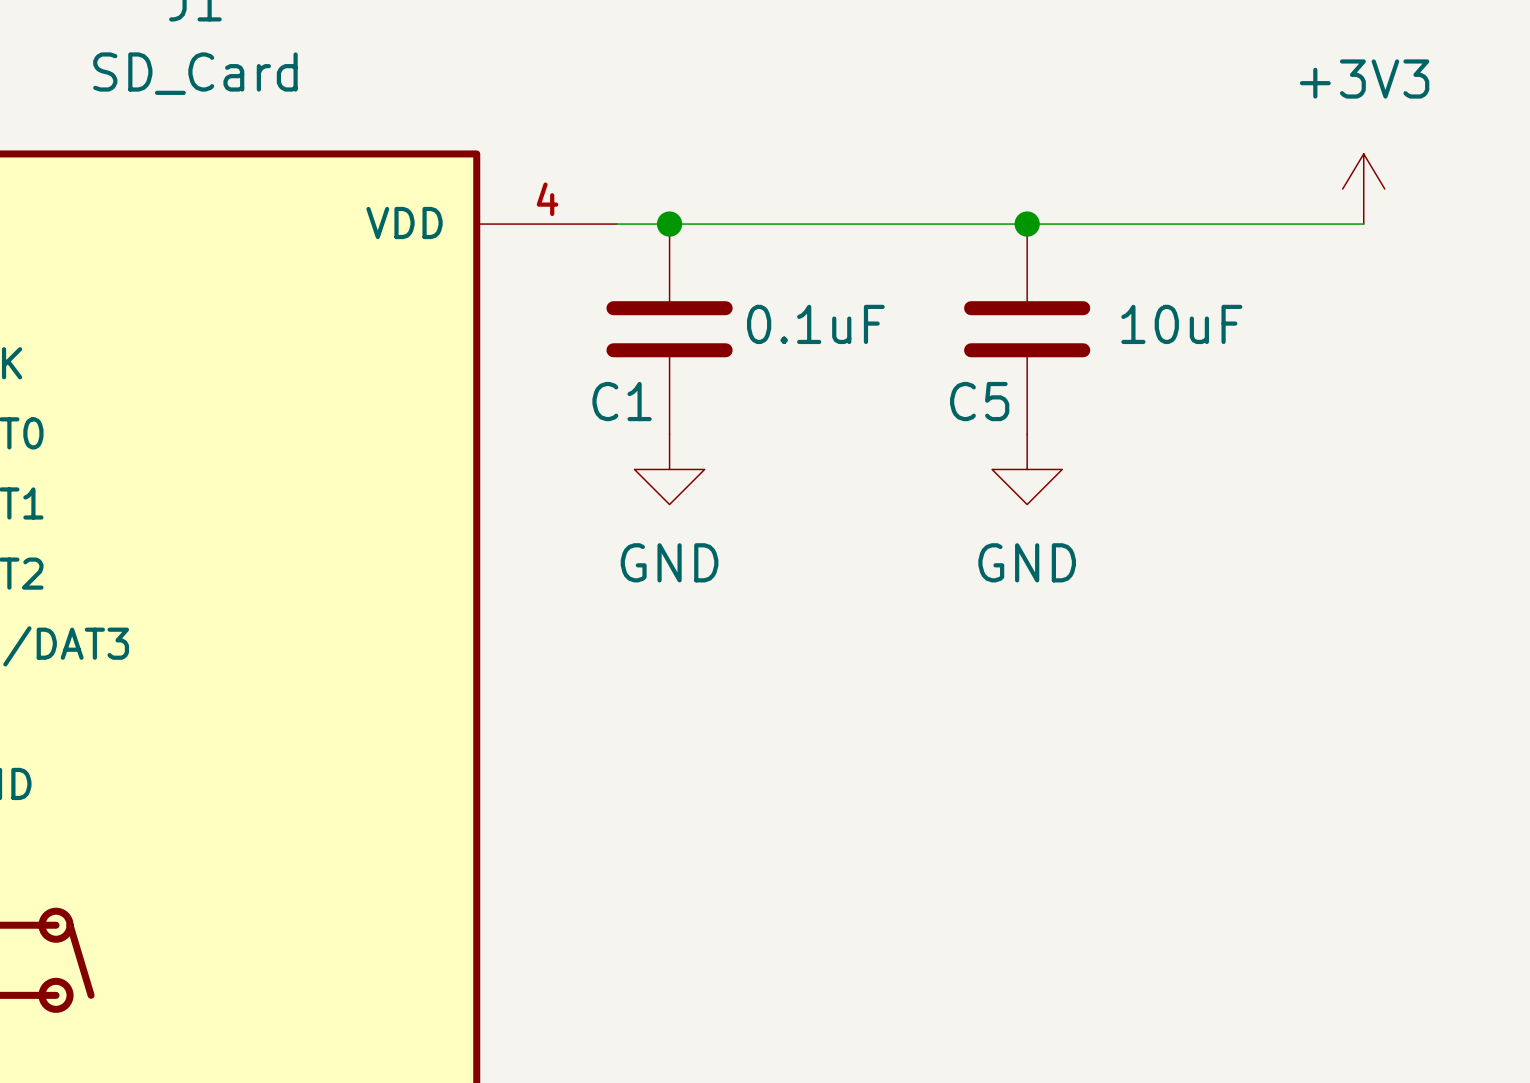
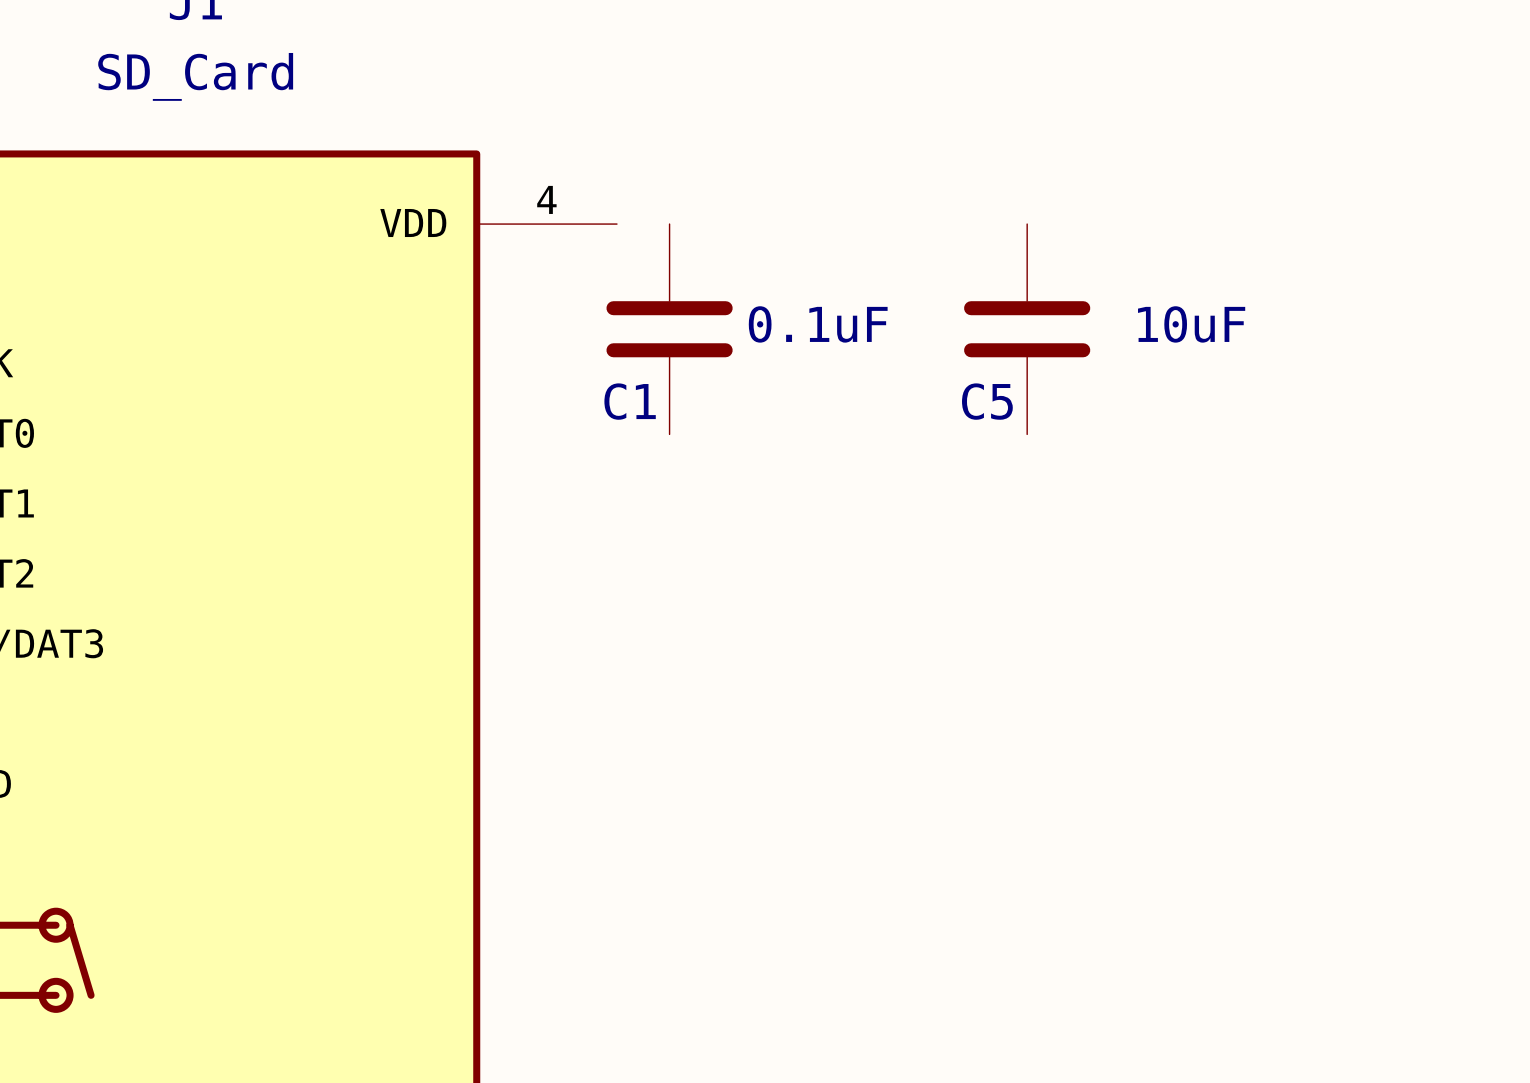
power symbol: +3V3 (1363, 188) -> none
wire: (616, 224) (1363, 224) -> none
junction: (669, 224) -> none
junction: (1027, 224) -> none
power symbol: GND (669, 469) -> none
power symbol: GND (1027, 469) -> none

